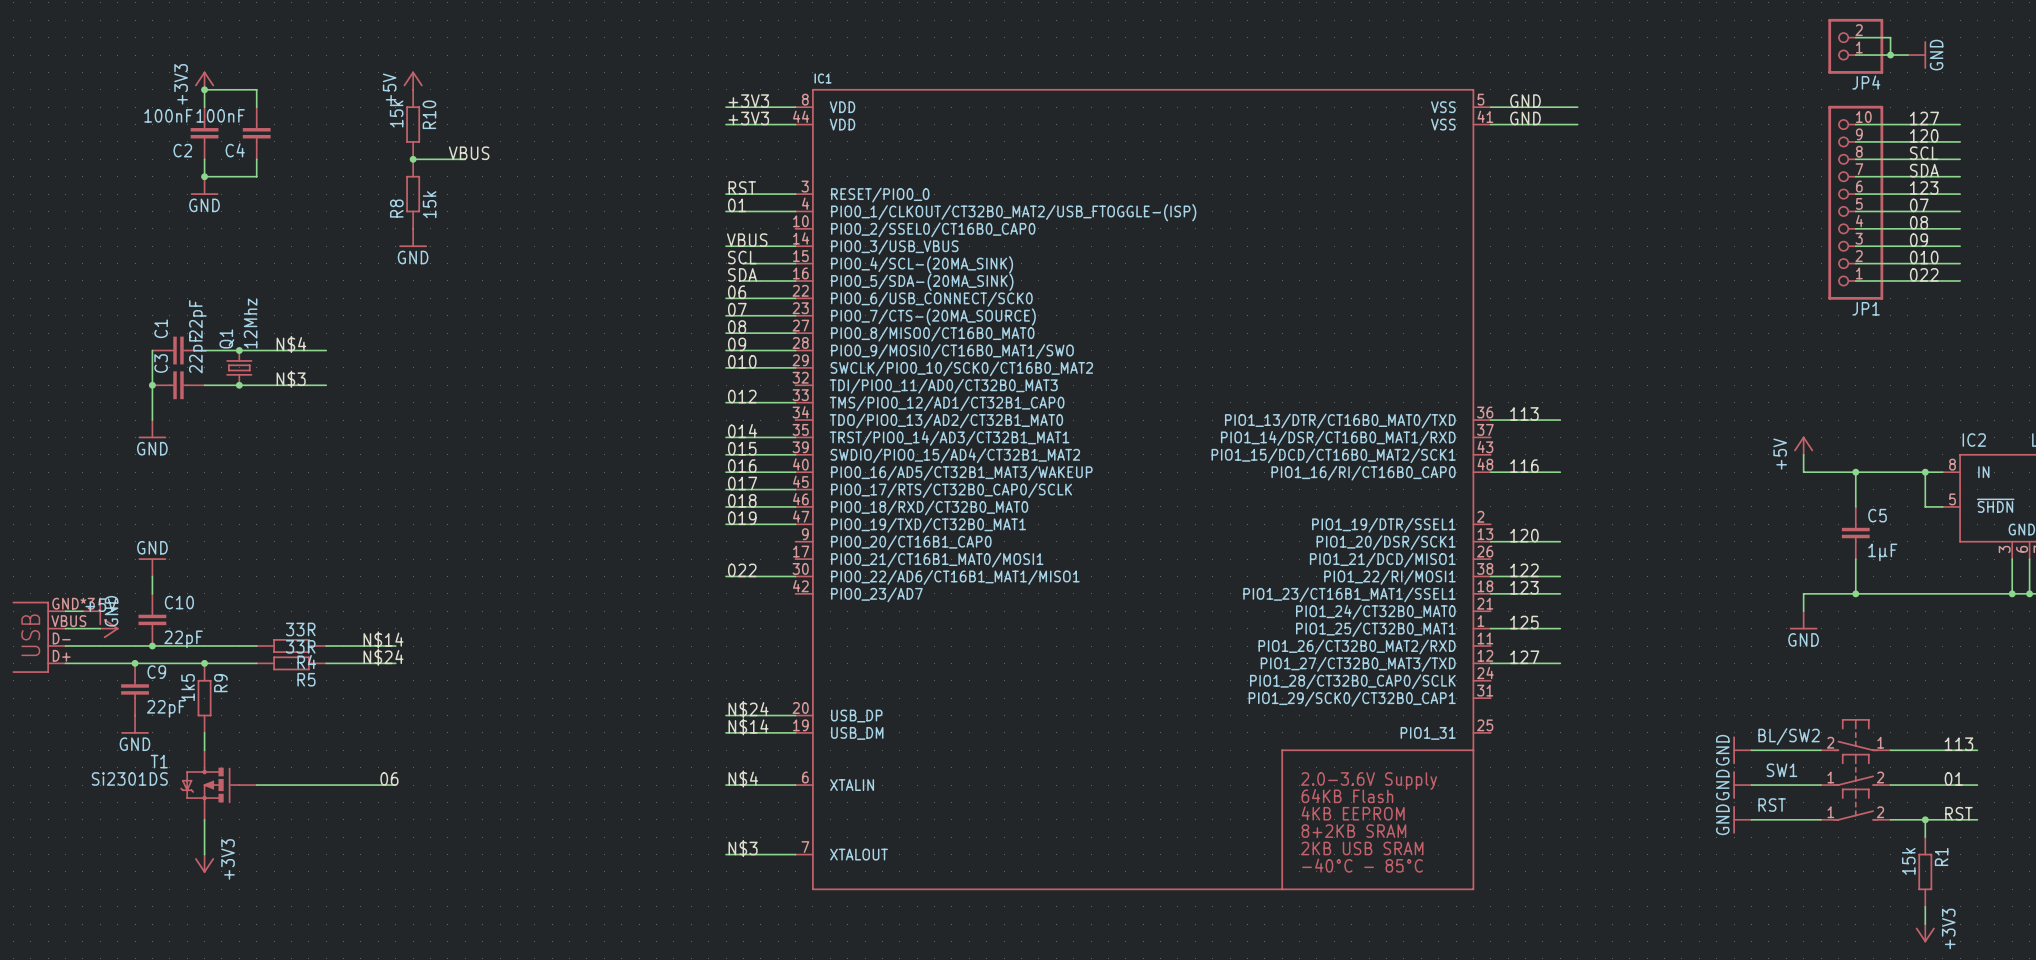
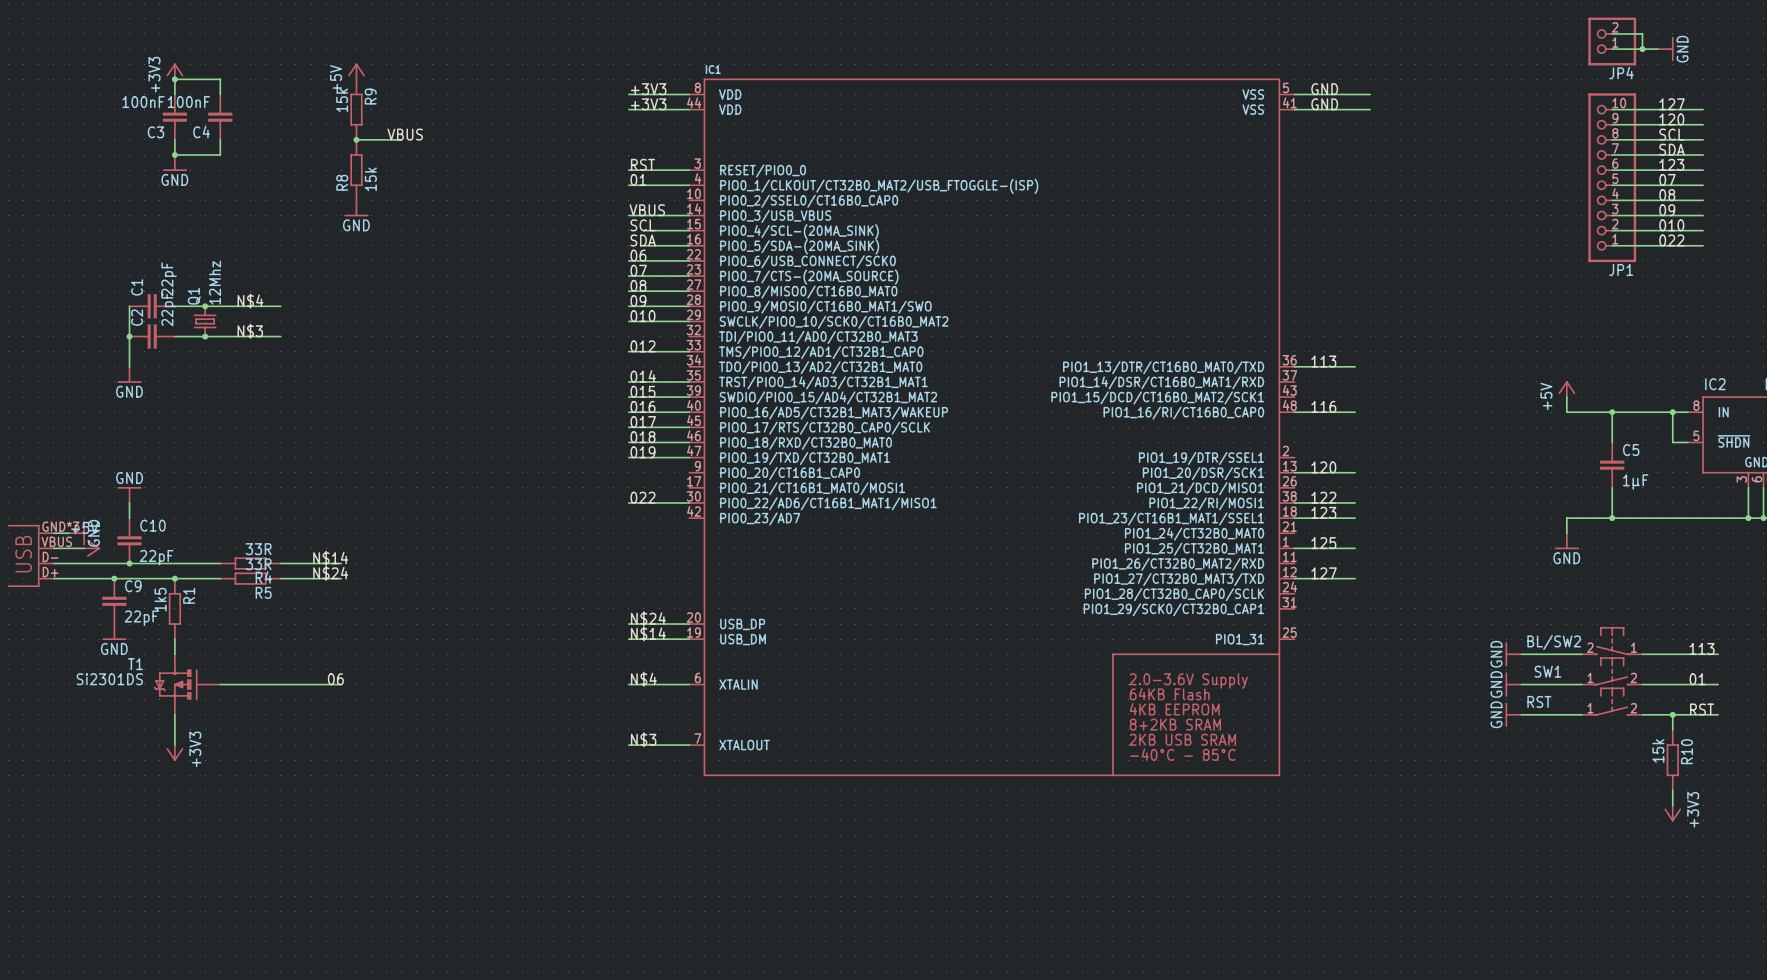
R10 name: R10 (429, 114) -> R9 (370, 96)
C2 name: C2 (182, 150) -> C3 (155, 132)
C3 name: C3 (161, 363) -> C2 (137, 317)
R9 name: R9 (220, 683) -> R1 (189, 595)
R1 name: R1 (1941, 856) -> R10 (1686, 751)

